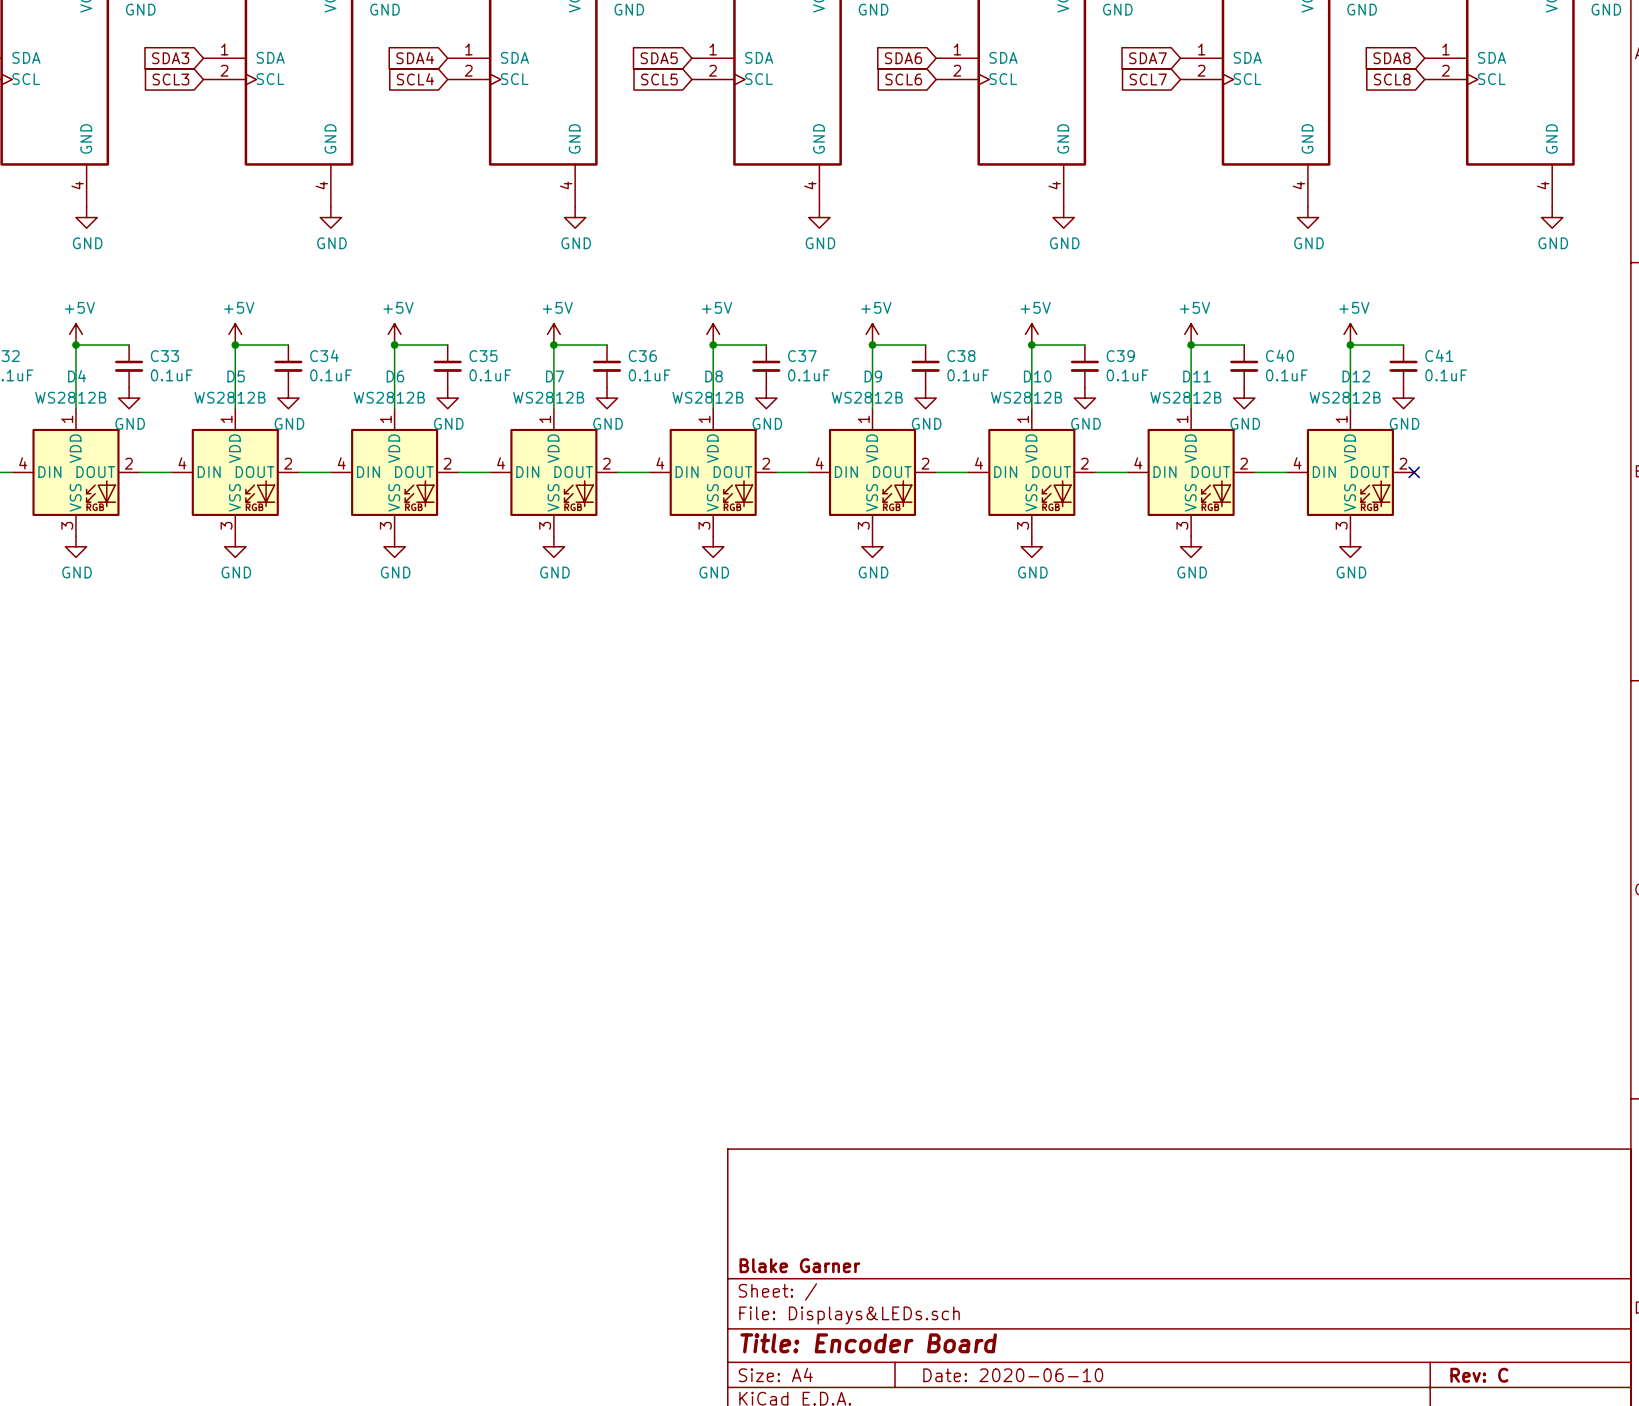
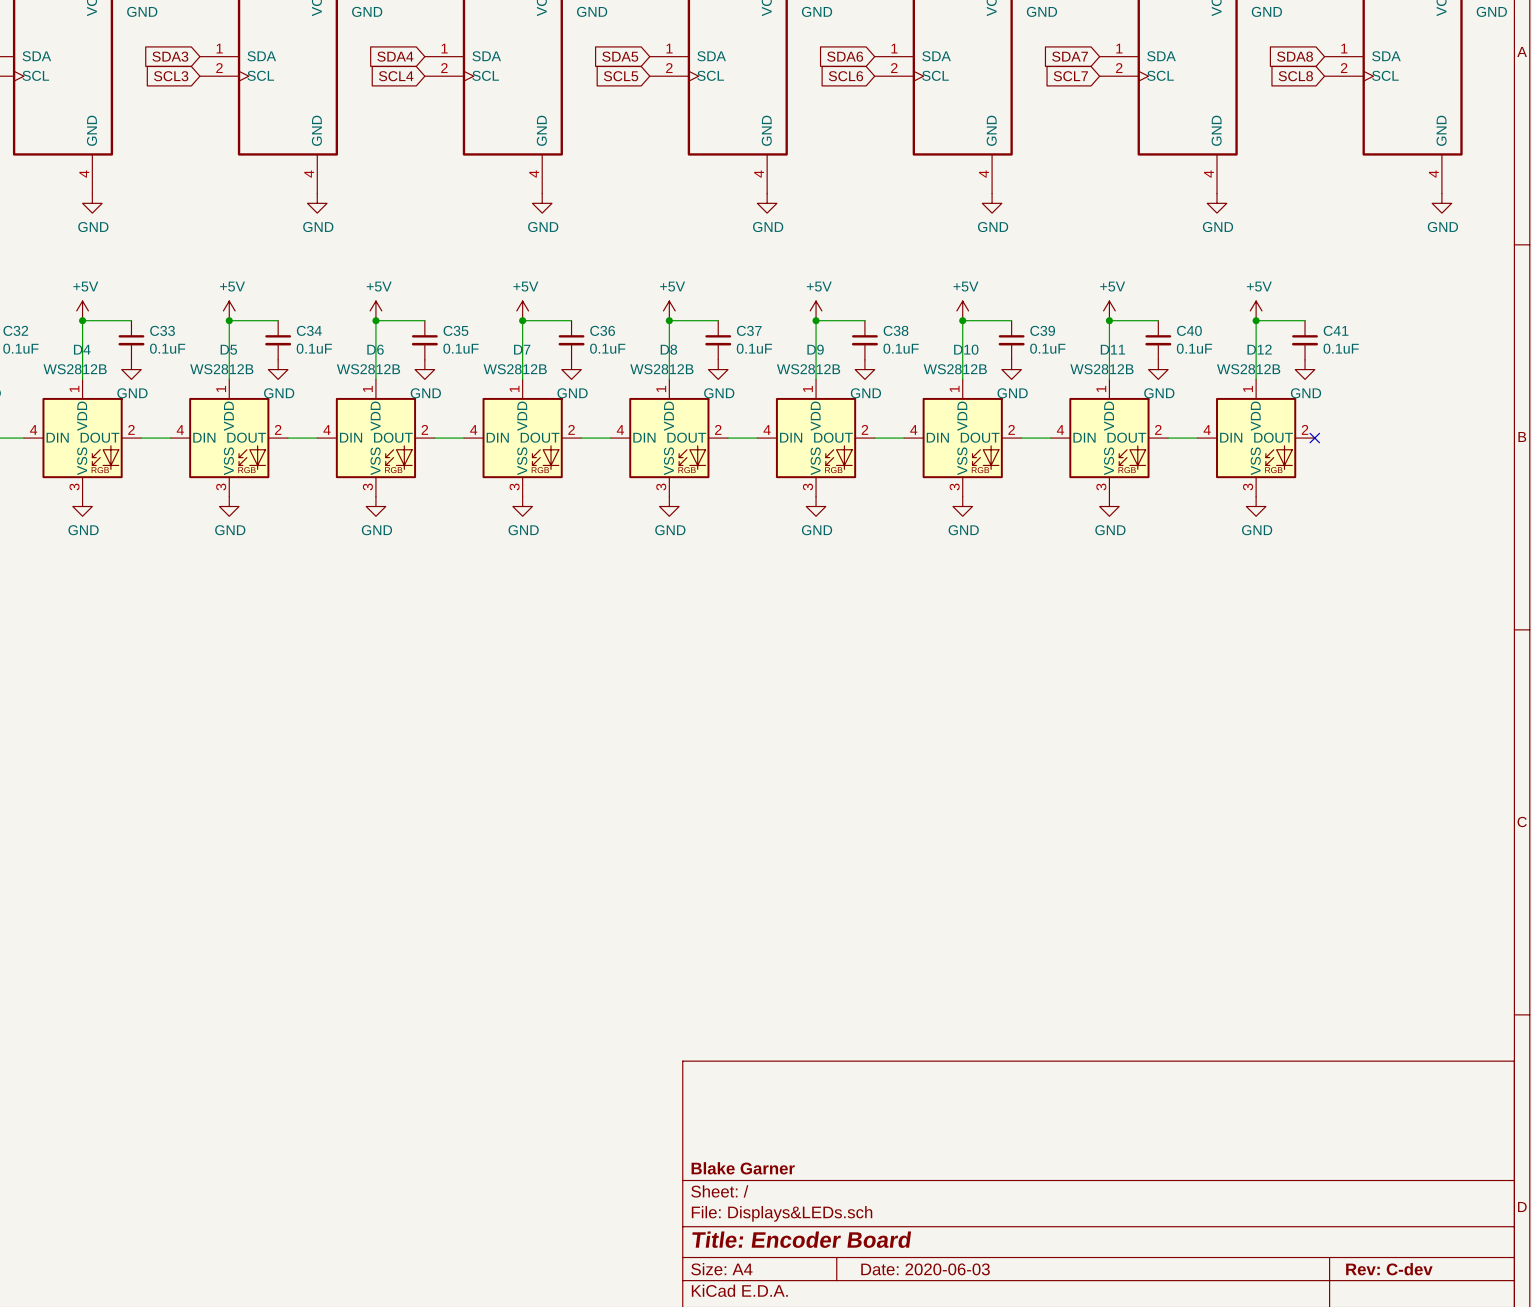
title block: Date: 2020-06-10 (1013, 1375) -> Date: 2020-06-03 (925, 1269)
title block: Rev: C (1479, 1375) -> Rev: C-dev (1389, 1269)

